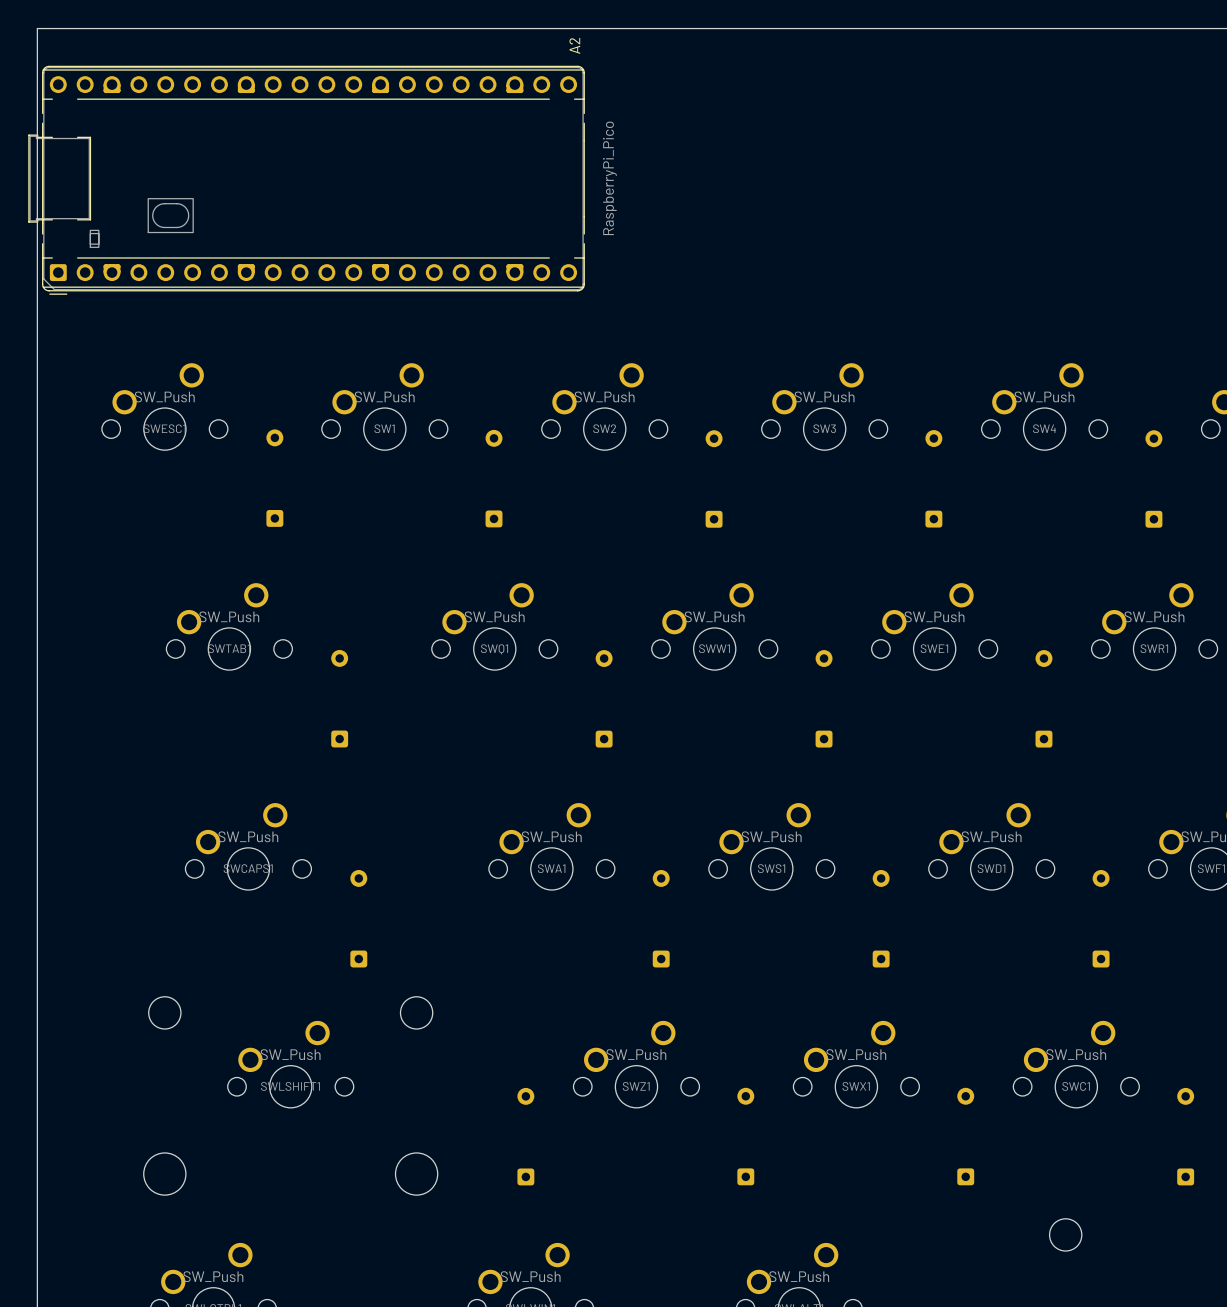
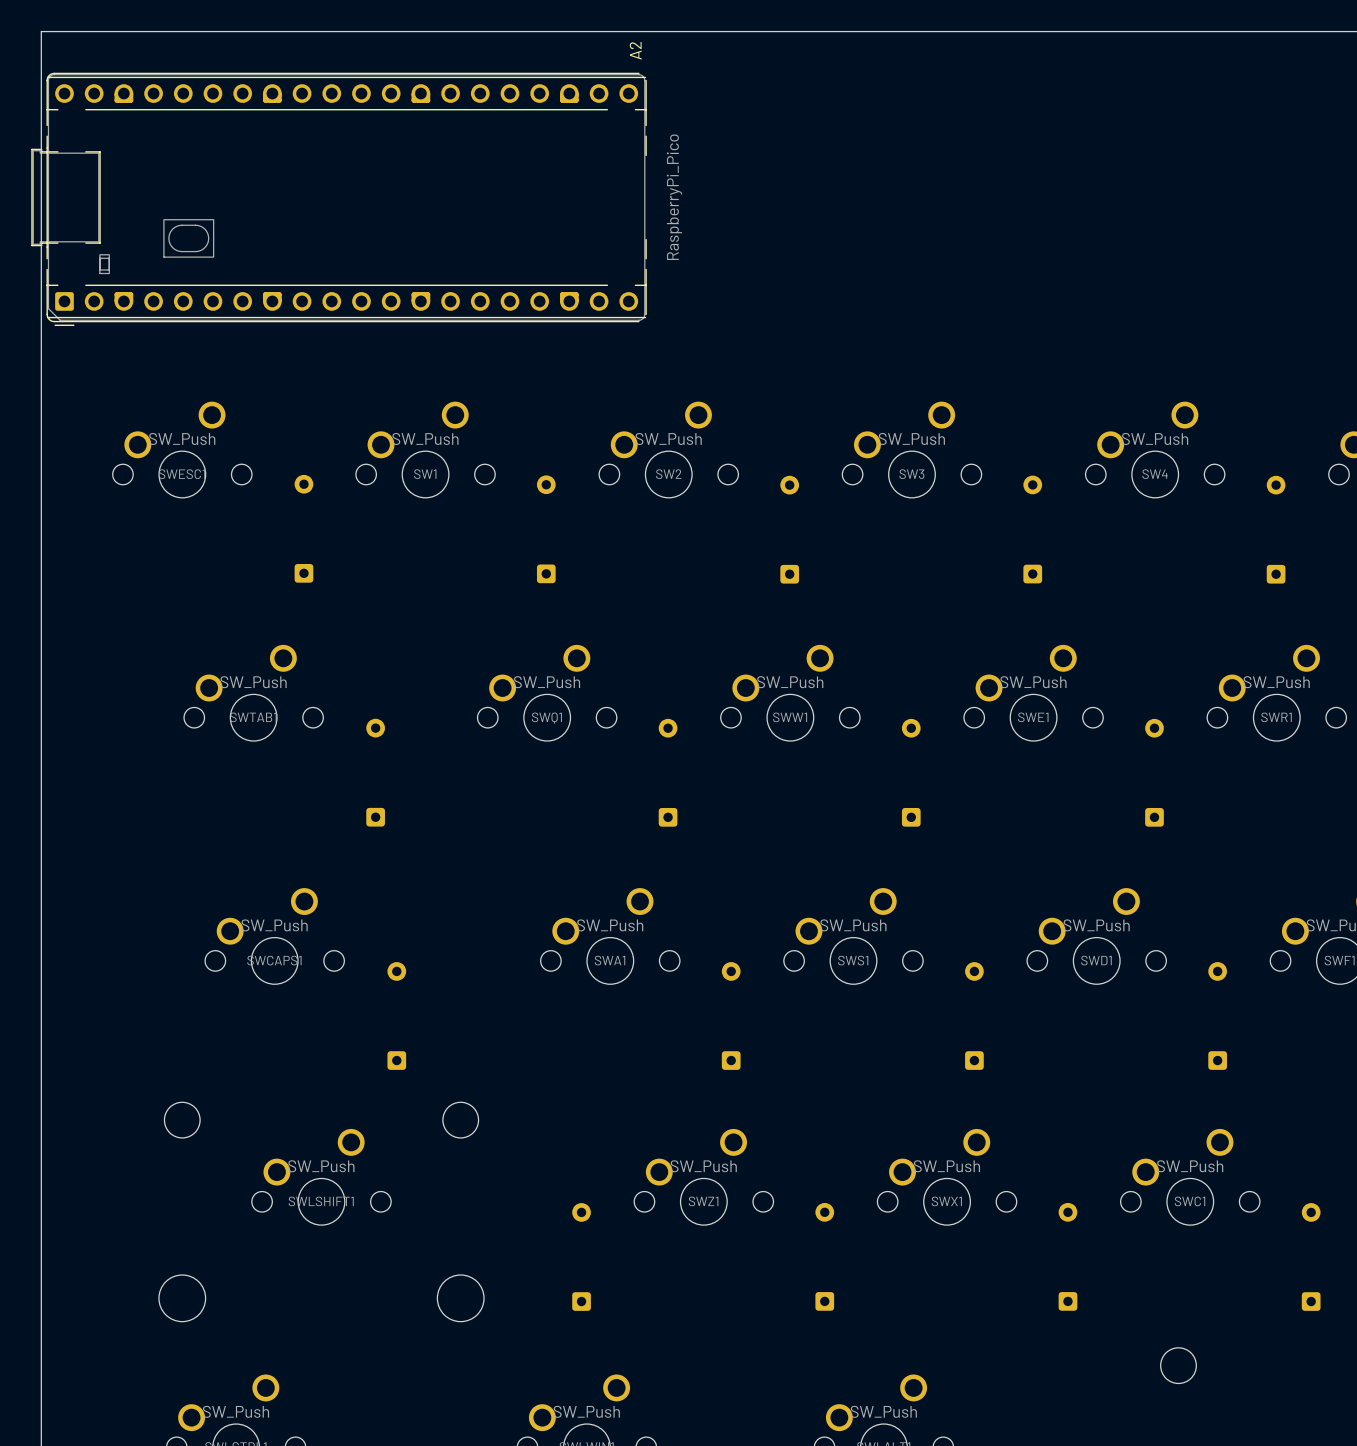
A2 footprint: [28, 65, 585, 295] -> [31, 72, 647, 326]

